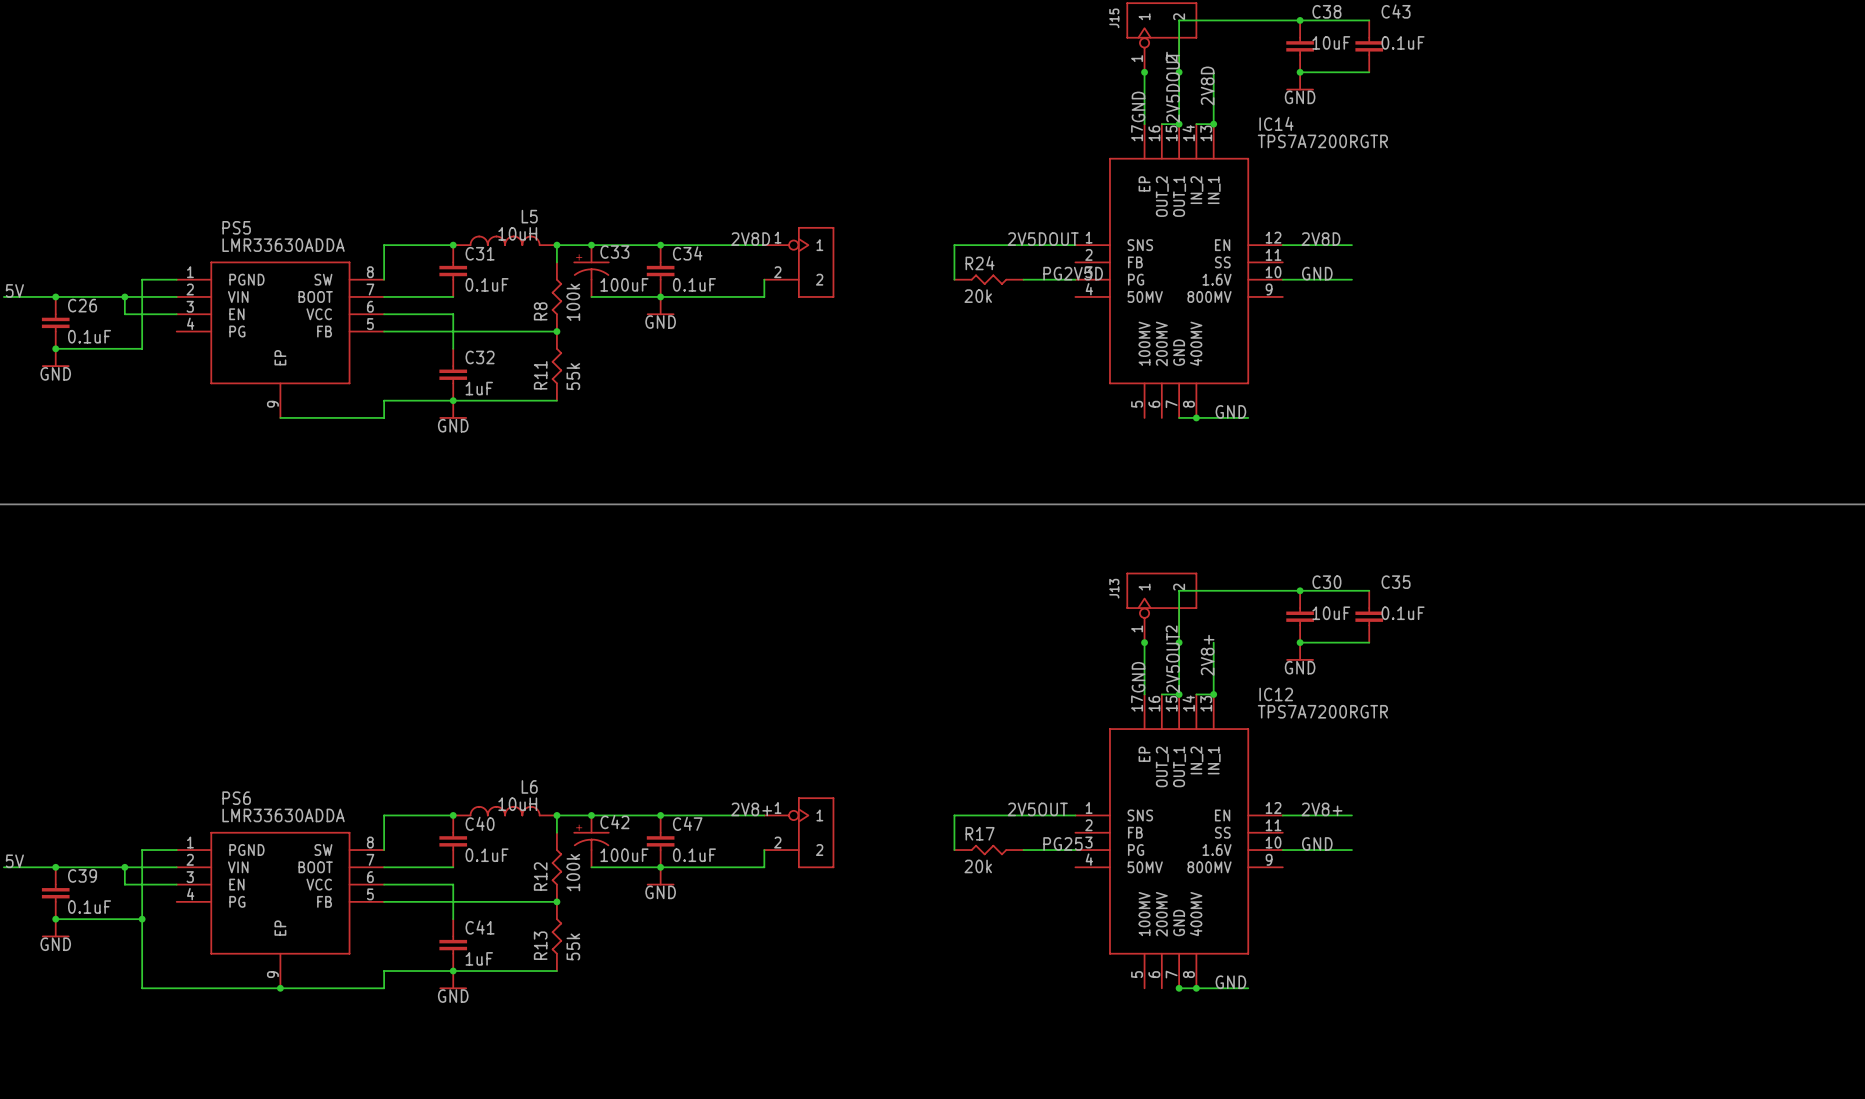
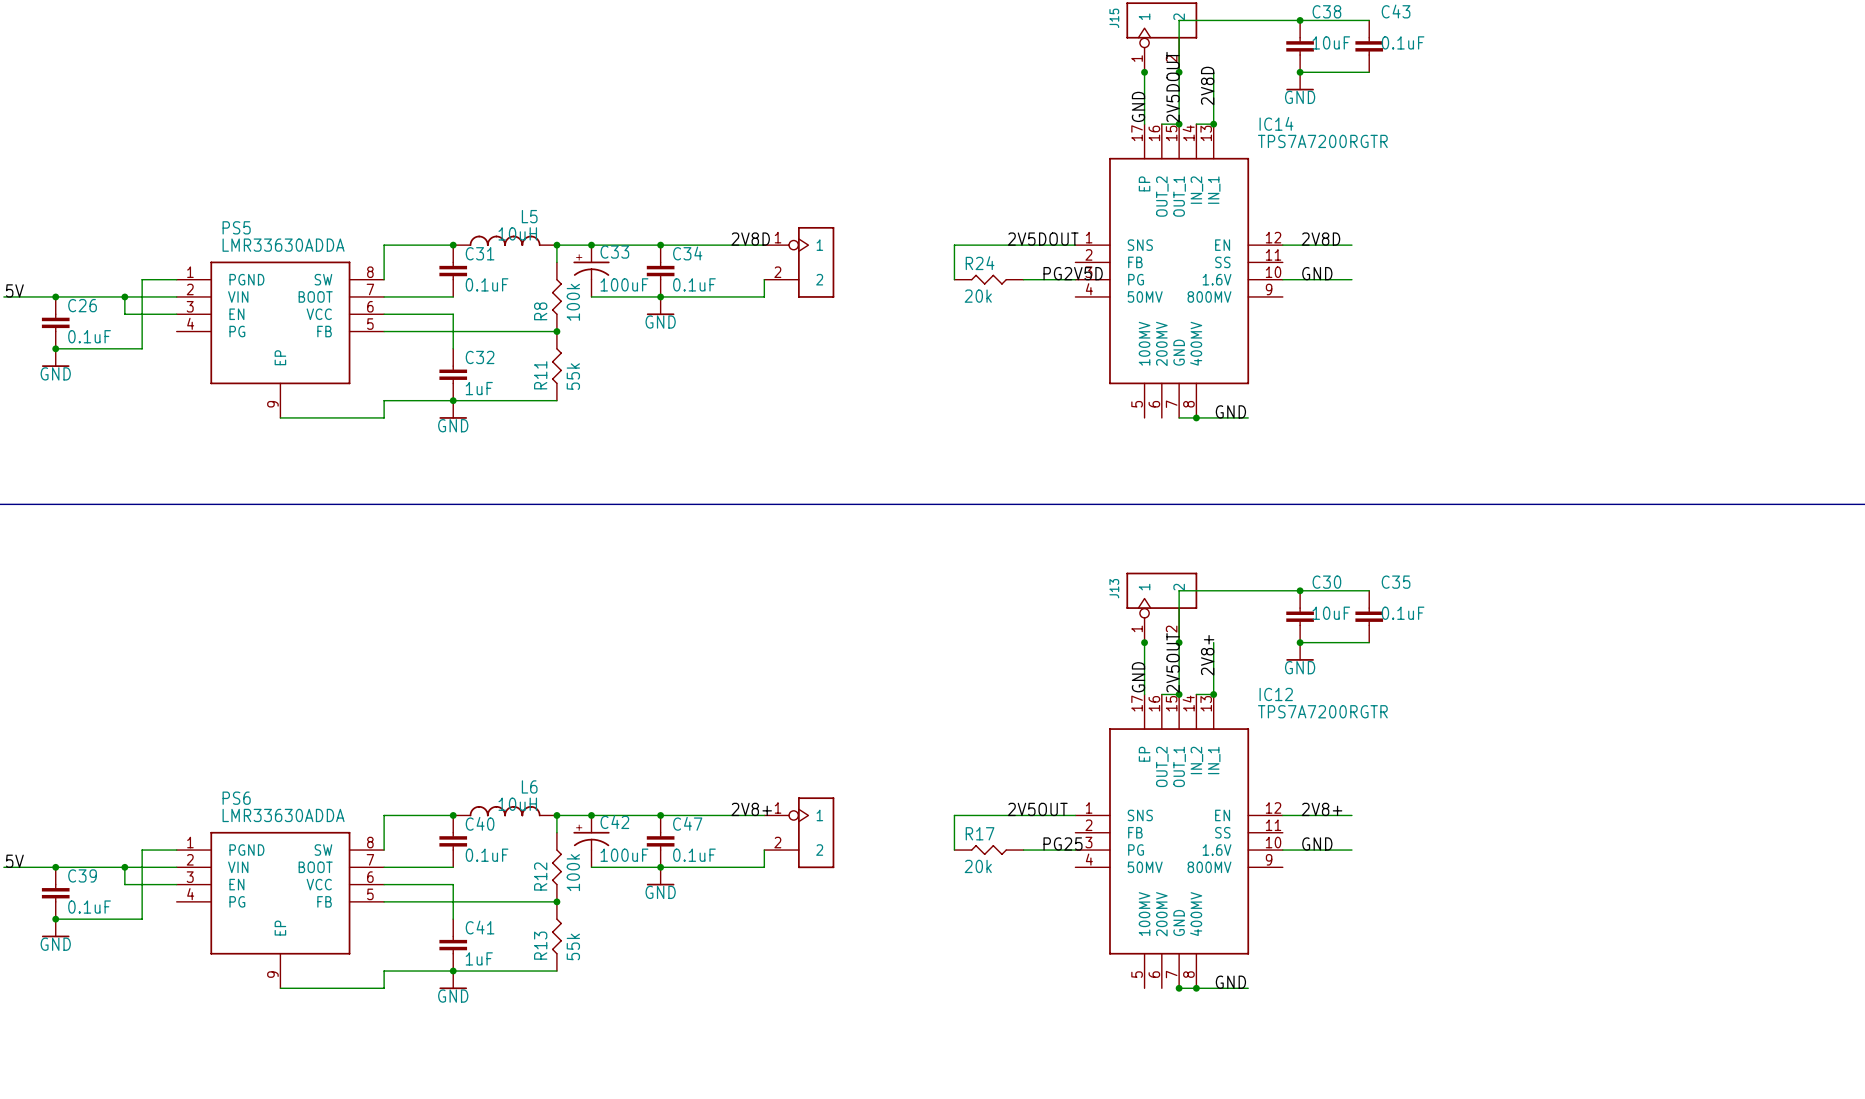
wire: (142, 919) (142, 988) (280, 988) -> none
junction: (142, 919) -> none
junction: (280, 988) -> none

